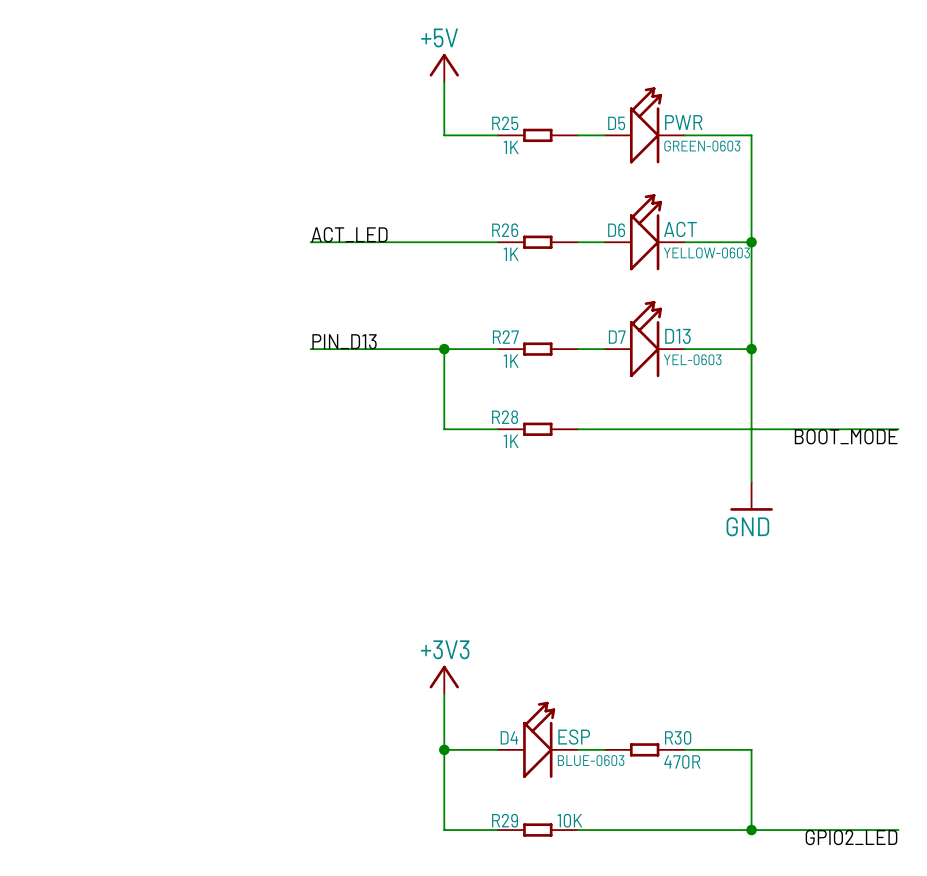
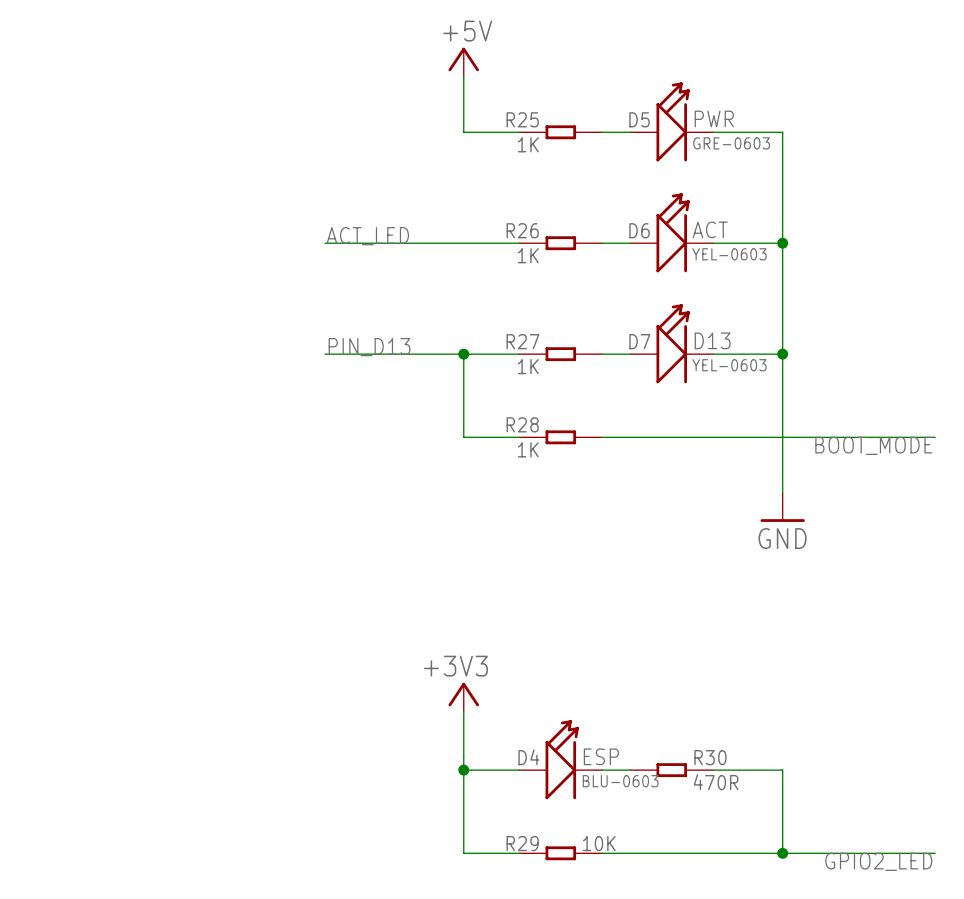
D5 value: GREEN-0603 (702, 146) -> GRE-0603 (731, 143)
D6 value: YELLOW-0603 (706, 252) -> YEL-0603 (729, 254)
D4 value: BLUE-0603 (591, 760) -> BLU-0603 (620, 781)

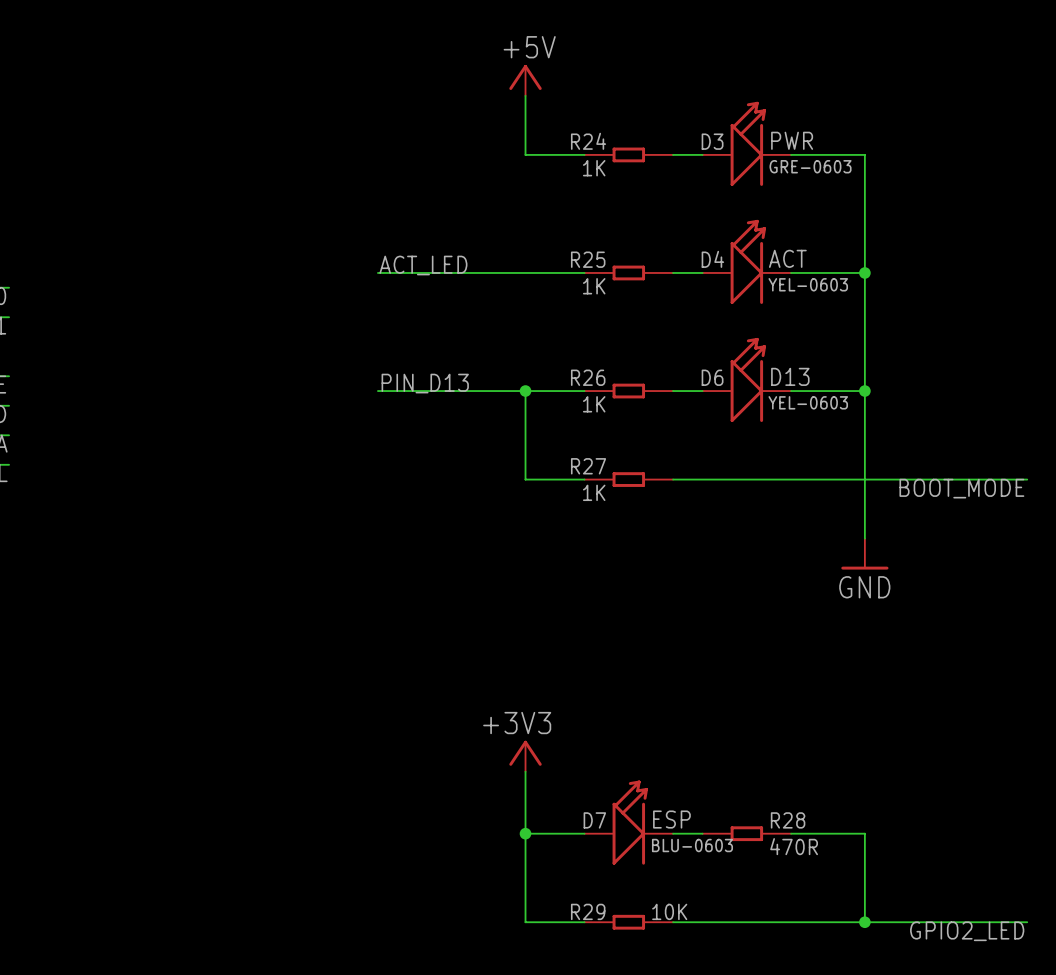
R25 name: R25 (522, 119) -> R24 (588, 141)
D5 name: D5 (639, 119) -> D3 (712, 141)
R26 name: R26 (522, 230) -> R25 (588, 259)
D6 name: D6 (639, 230) -> D4 (712, 259)
R27 name: R27 (522, 341) -> R26 (588, 377)
D7 name: D7 (639, 341) -> D6 (712, 377)
R28 name: R28 (522, 424) -> R27 (588, 466)
D4 name: D4 (528, 757) -> D7 (594, 820)
R30 name: R30 (710, 757) -> R28 (788, 820)

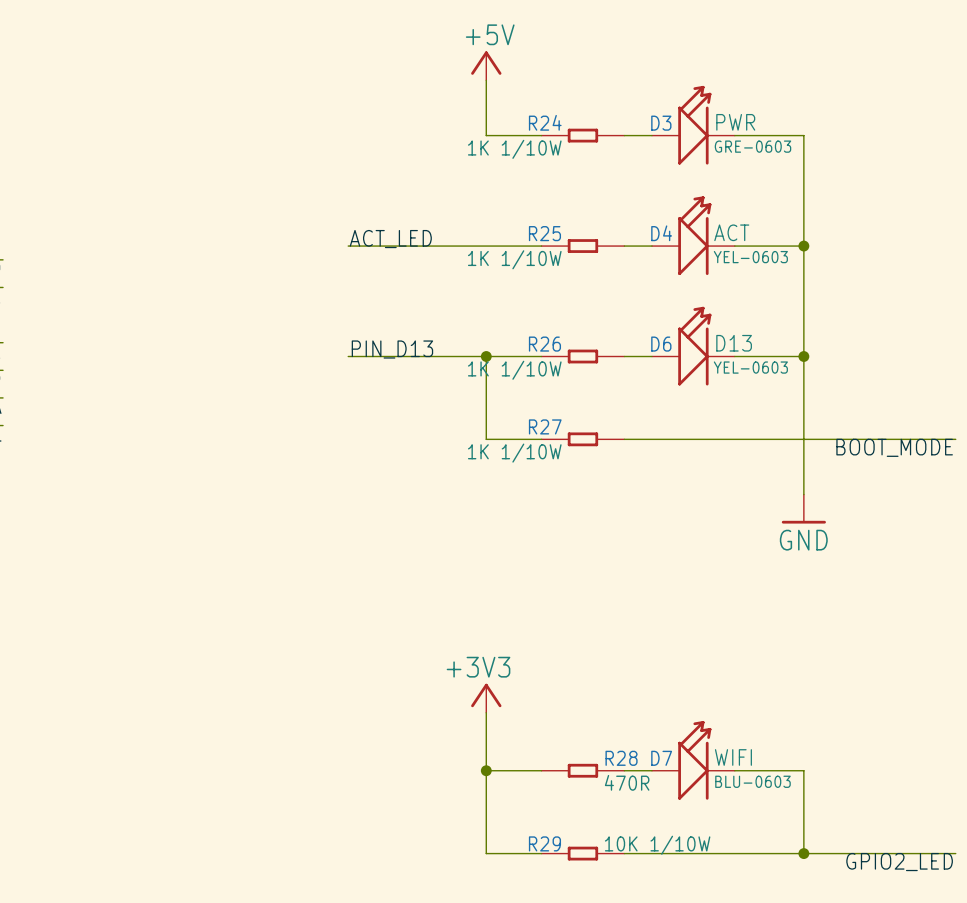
R24 value: 1K (594, 168) -> 1K 1/10W (514, 149)
R25 value: 1K (594, 286) -> 1K 1/10W (514, 259)
R26 value: 1K (594, 404) -> 1K 1/10W (514, 370)
R27 value: 1K (594, 492) -> 1K 1/10W (514, 453)
D7 text: ESP (671, 819) -> WIFI (733, 757)
D7 position: (628, 822) -> (693, 760)
R28 position: (746, 833) -> (582, 770)
R29 value: 10K (669, 911) -> 10K 1/10W (657, 845)

